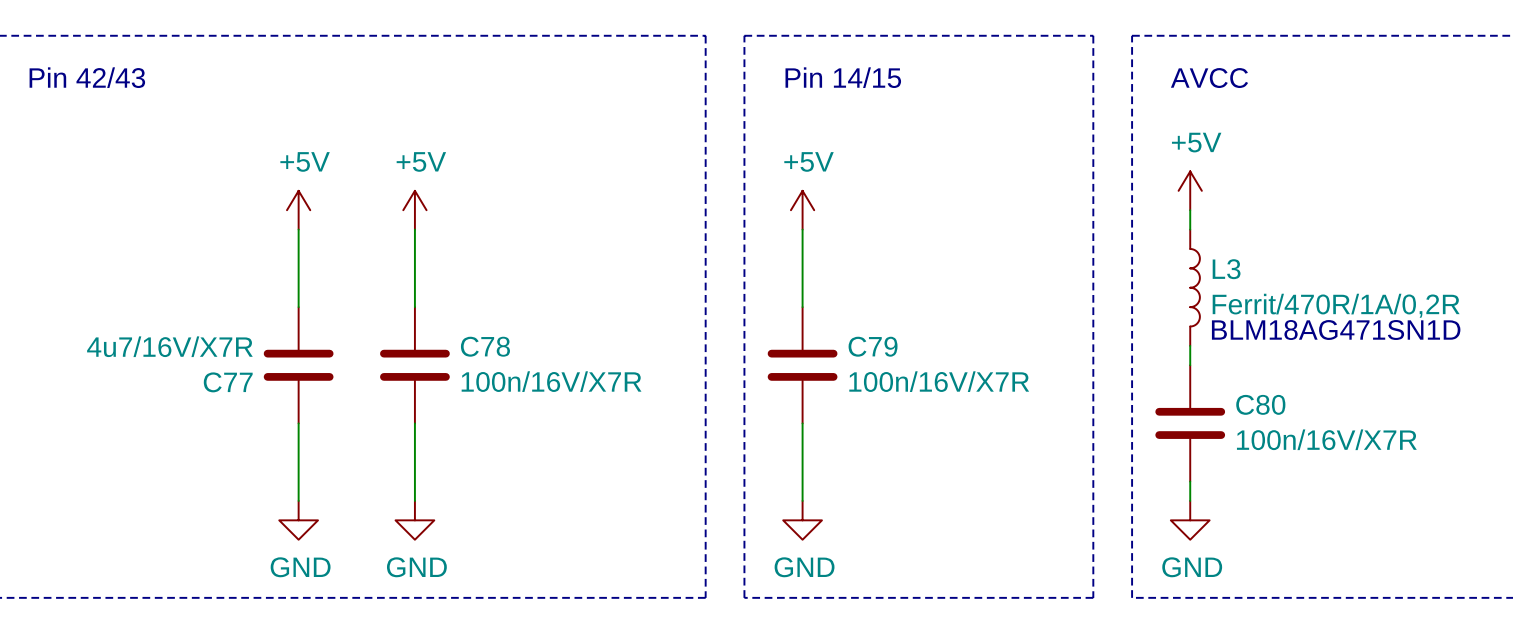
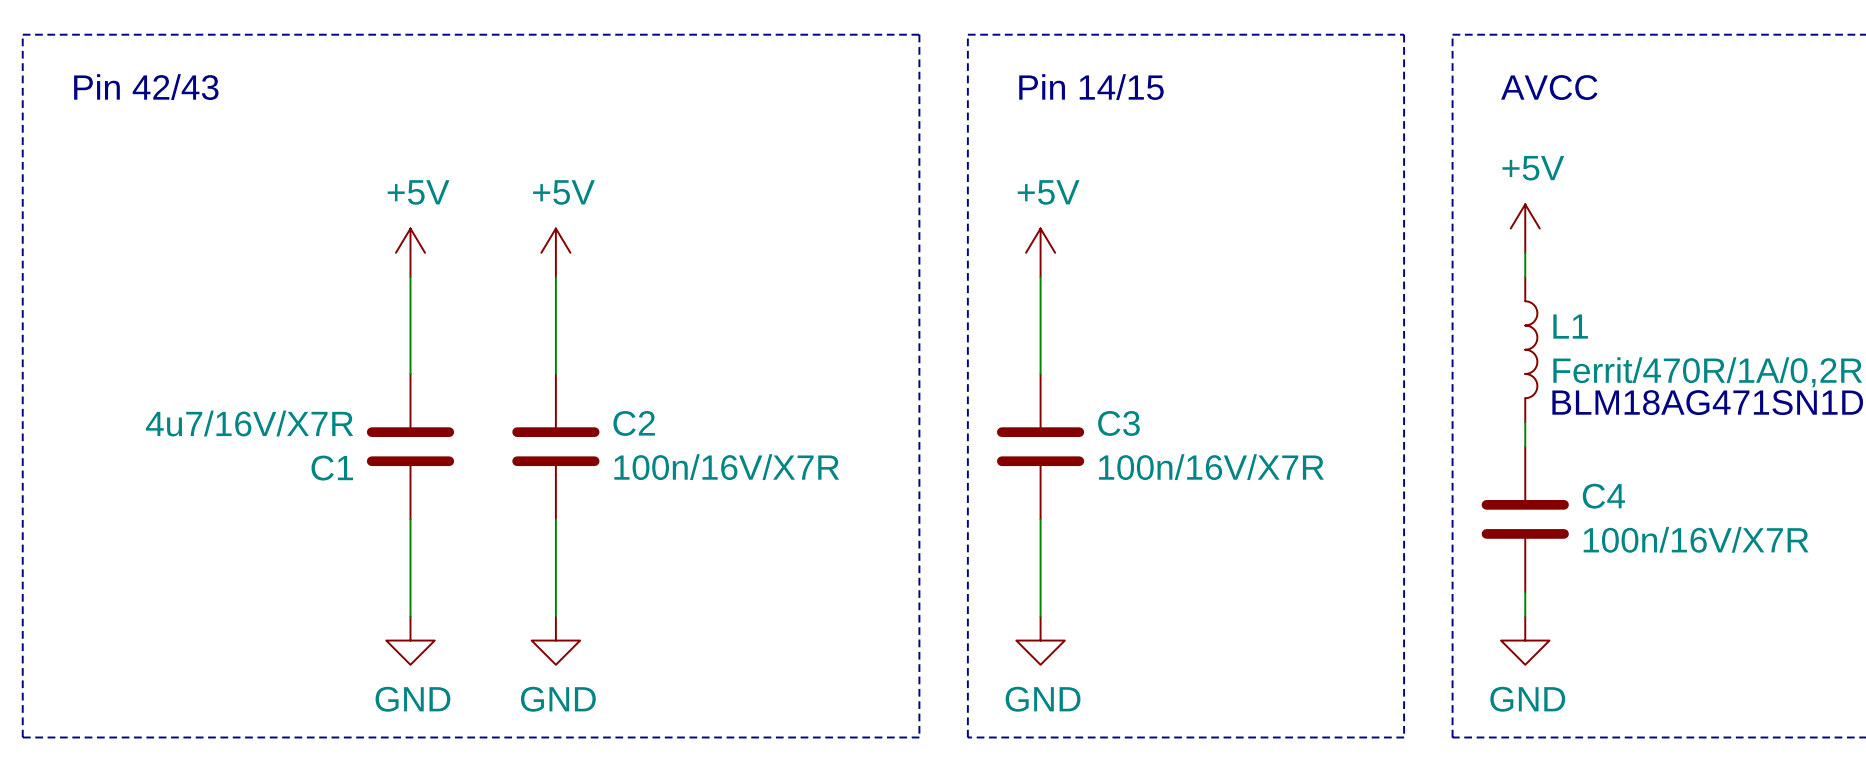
L3 name: L3 (1226, 269) -> L1 (1570, 326)
C78 name: C78 (485, 346) -> C2 (634, 423)
C79 name: C79 (873, 346) -> C3 (1118, 423)
C77 name: C77 (228, 382) -> C1 (332, 468)
C80 name: C80 (1260, 404) -> C4 (1603, 496)

